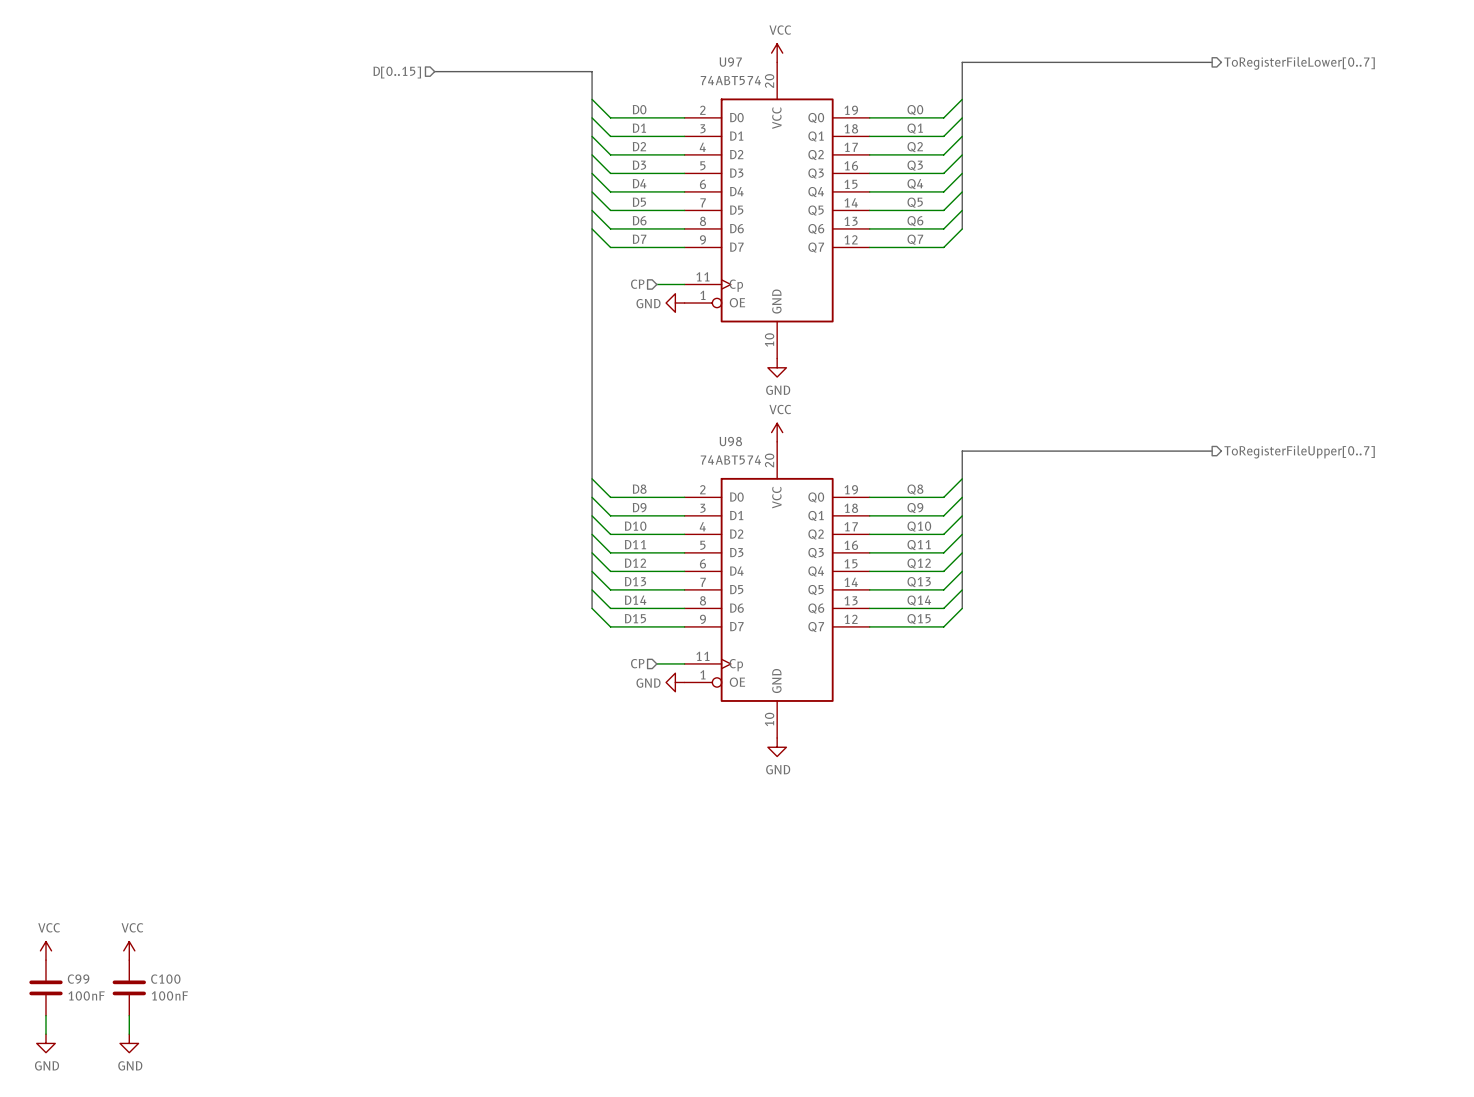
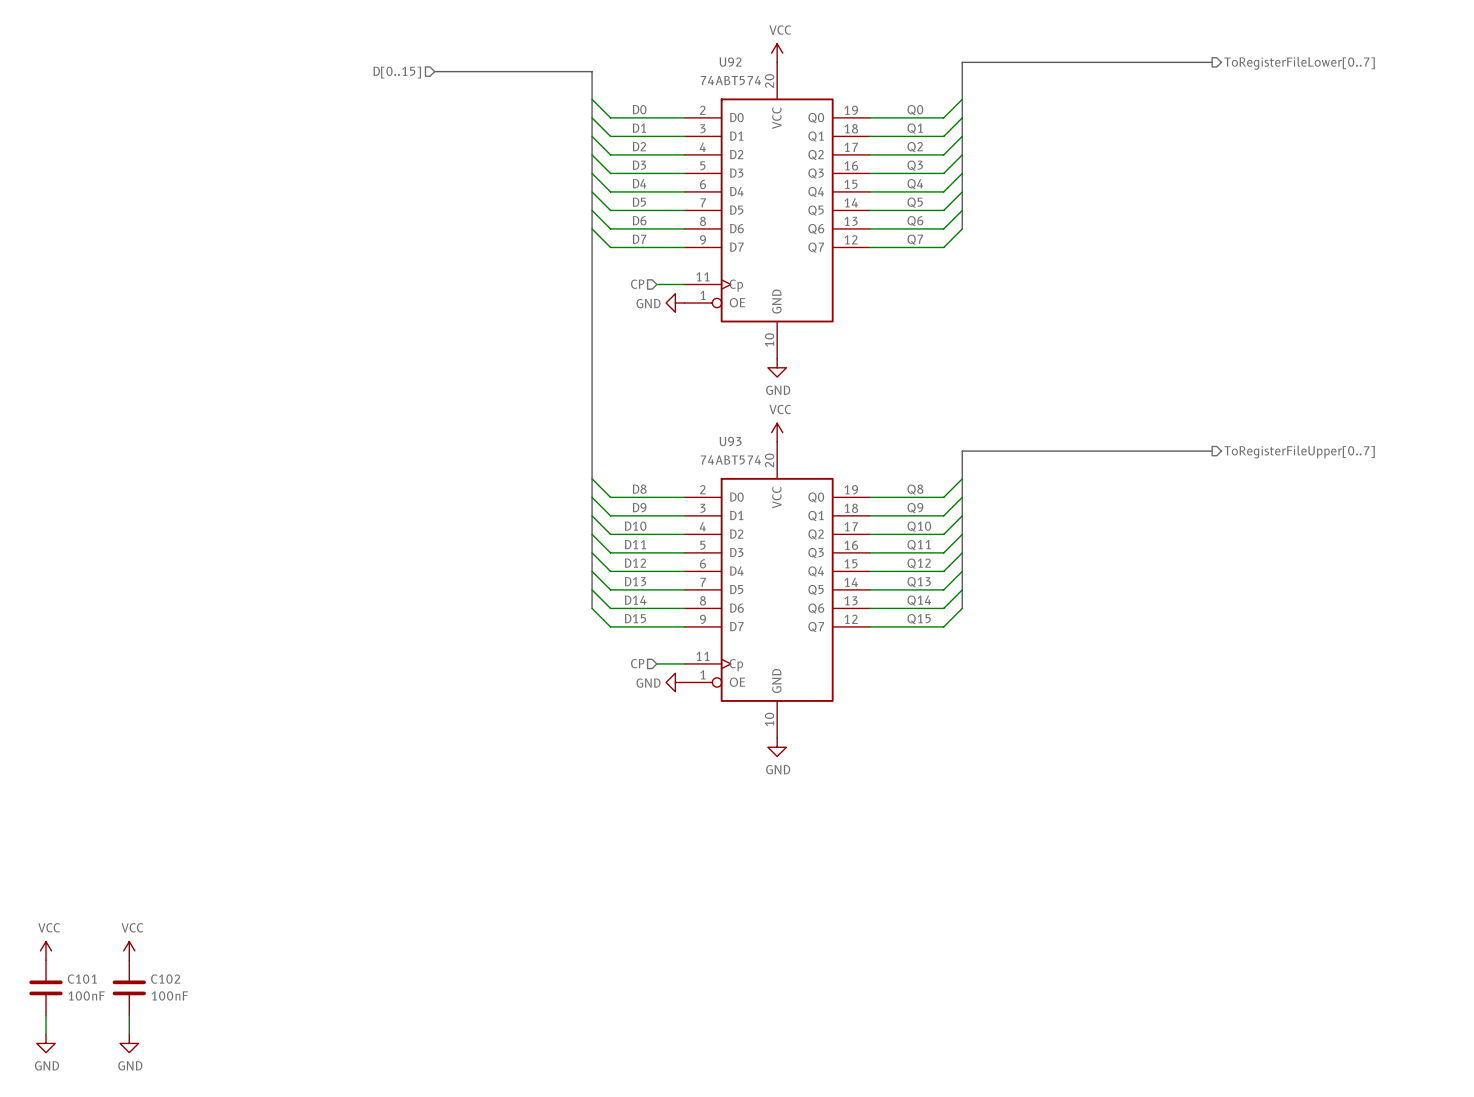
U97 name: U97 (730, 62) -> U92 (730, 62)
U98 name: U98 (730, 441) -> U93 (730, 441)
C99 name: C99 (78, 979) -> C101 (82, 979)
C100 name: C100 (165, 979) -> C102 (165, 979)

